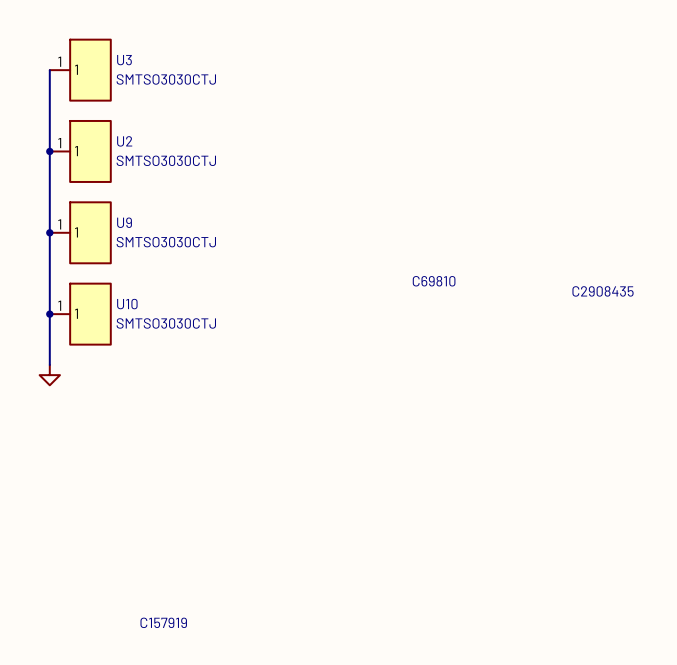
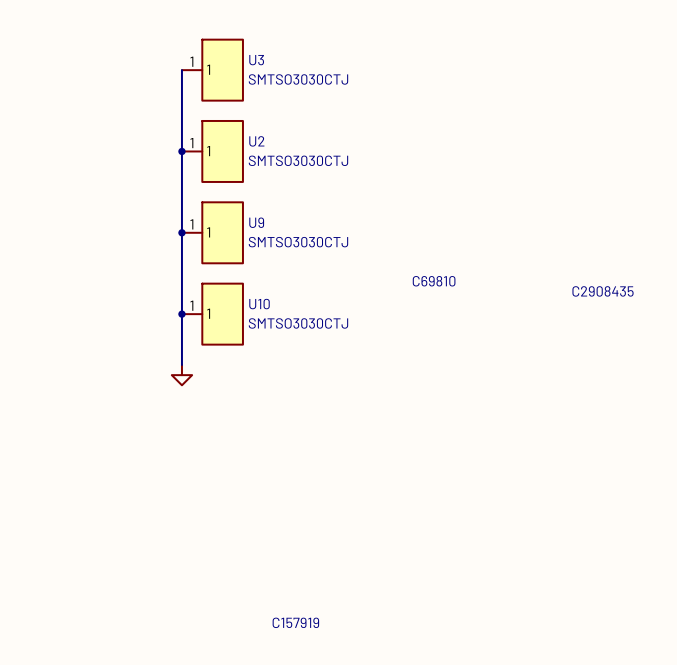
wire: (49, 70) (49, 364) -> (181, 70) (181, 364)
U3 position: (80, 70) -> (212, 70)
junction: (49, 151) -> none
U2 position: (80, 151) -> (212, 151)
junction: none -> (181, 151)
junction: (49, 232) -> none
U9 position: (80, 232) -> (212, 232)
junction: none -> (181, 232)
junction: (49, 314) -> none
U10 position: (80, 314) -> (212, 314)
junction: none -> (181, 314)
power symbol position: (49, 375) -> (181, 375)
text position: C157919 (163, 622) -> C157919 (295, 622)

